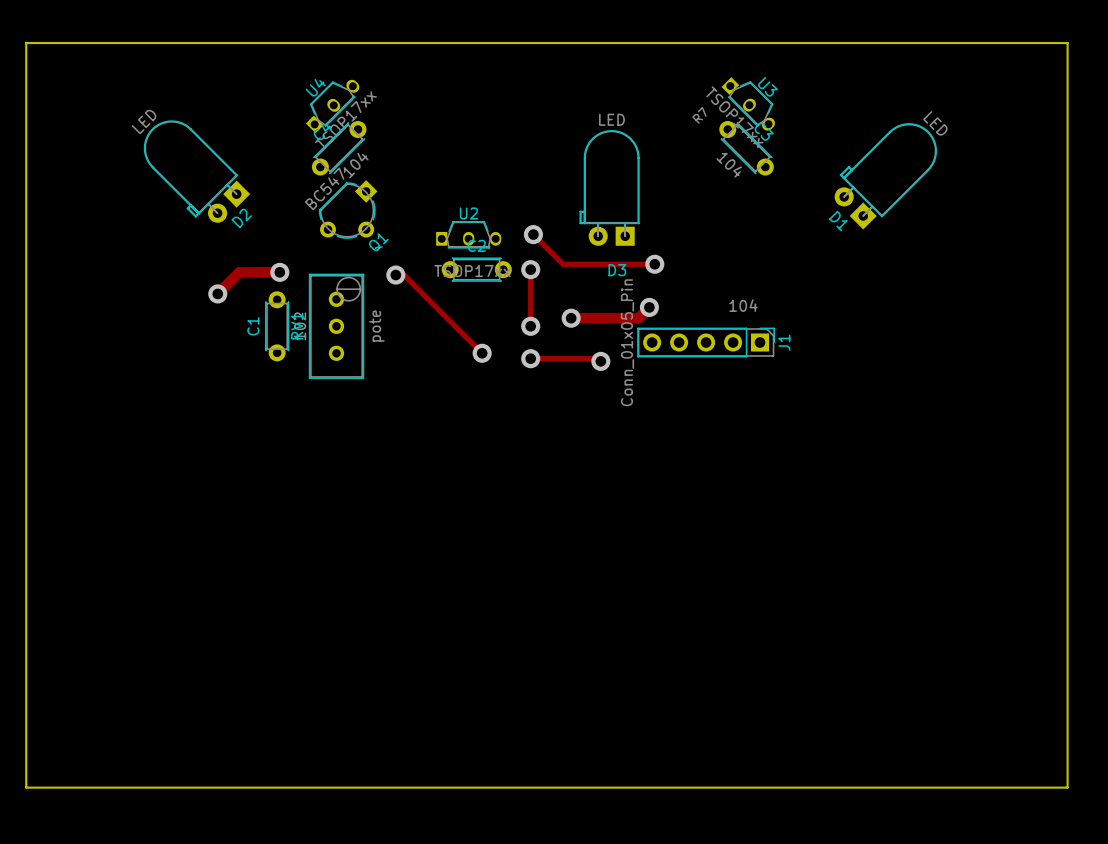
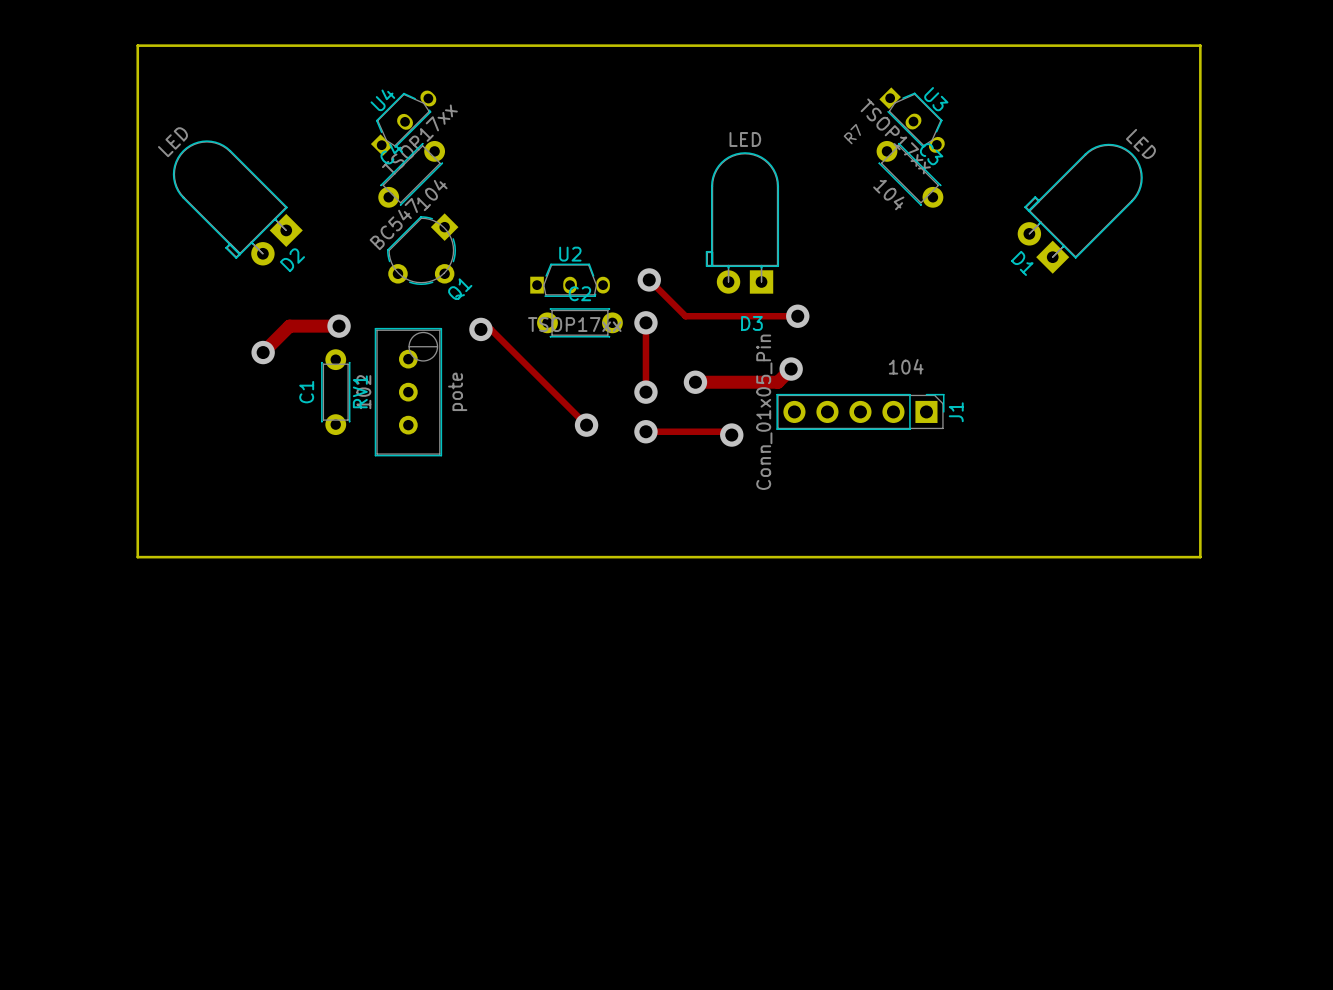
board edge: (115, 43) (26, 43) (26, 787) (1067, 787) (1067, 43) (983, 43) -> (137, 45) (137, 557) (1200, 557) (1200, 45)

